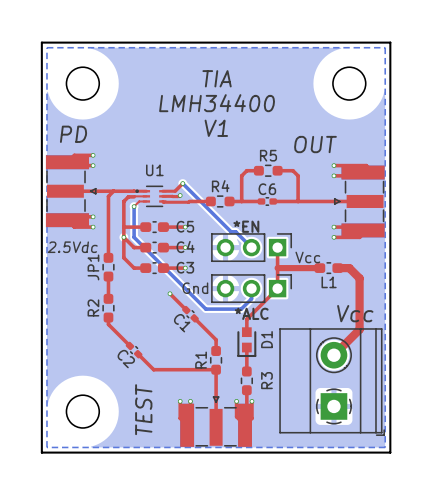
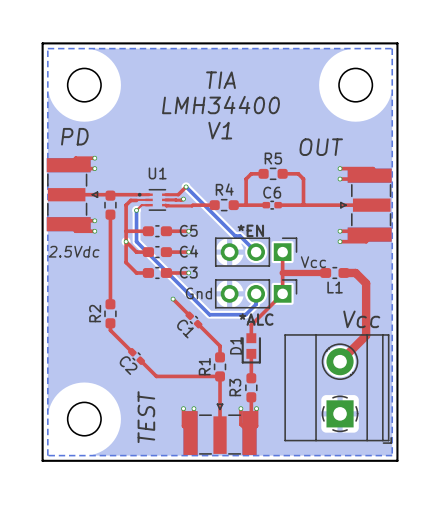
top track: (113, 191) (108, 196) (108, 210) -> none
part: none -> (110, 205)
top track: none -> (110, 262) (110, 281)
JP1: (108, 267) -> none
D1 name position: D1 (266, 339) -> D1 (236, 345)
R3 name position: R3 (266, 380) -> R3 (235, 387)

